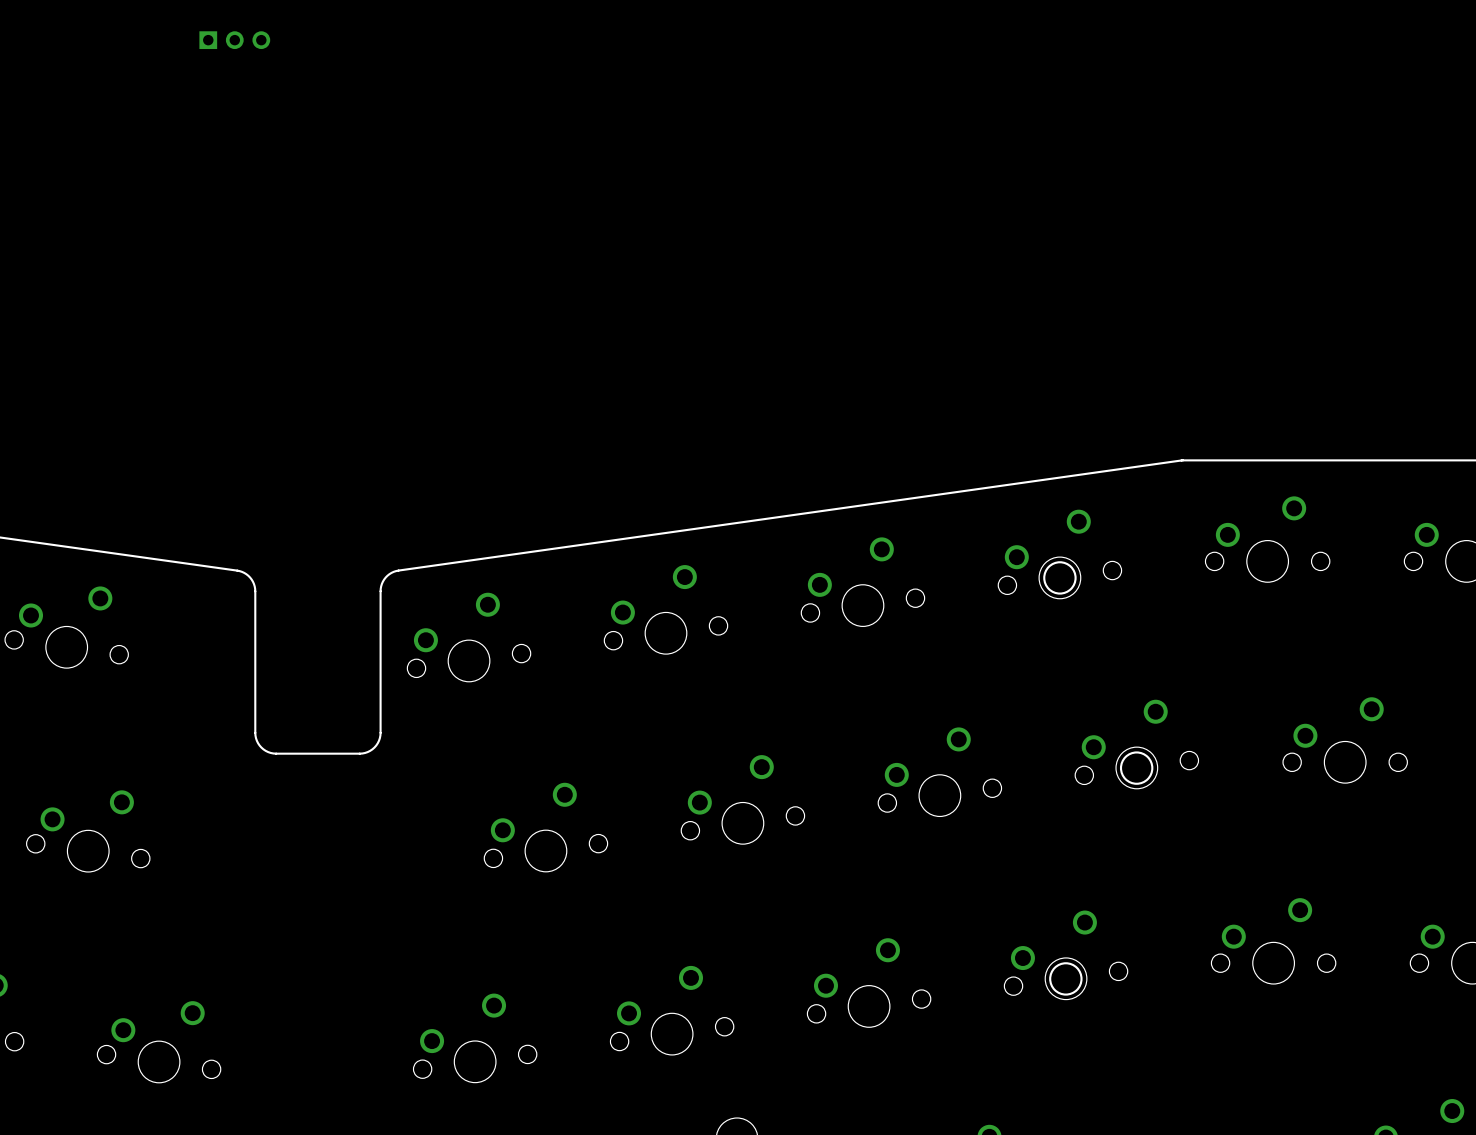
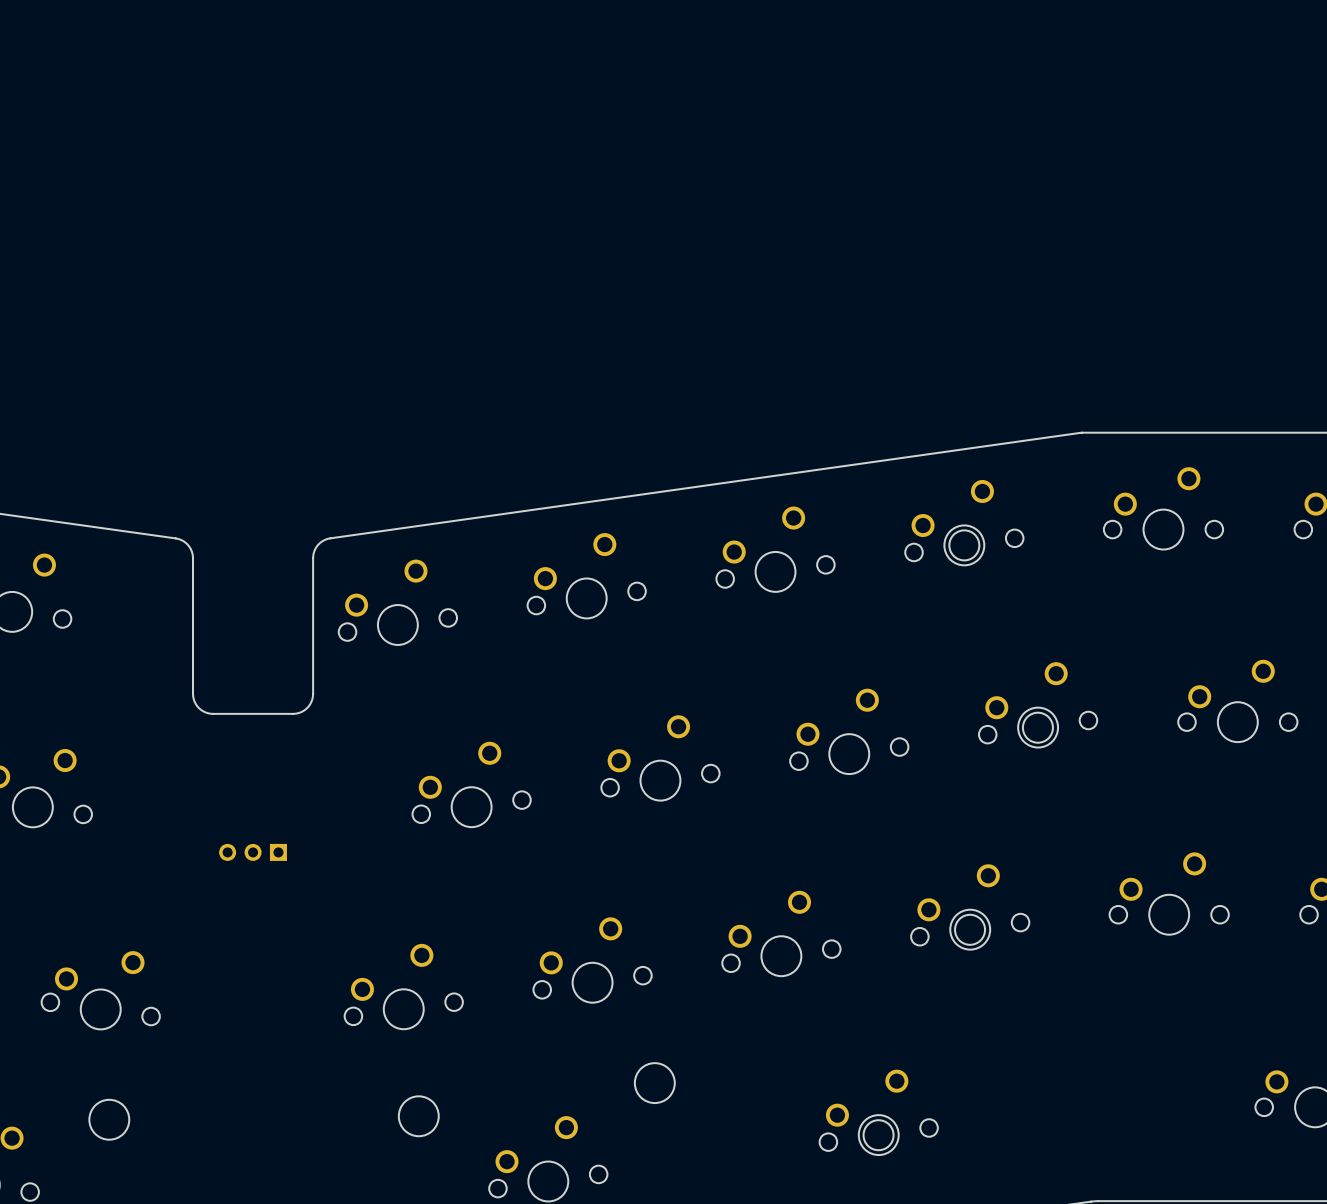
part: (234, 40) -> none
part: none -> (253, 852)

